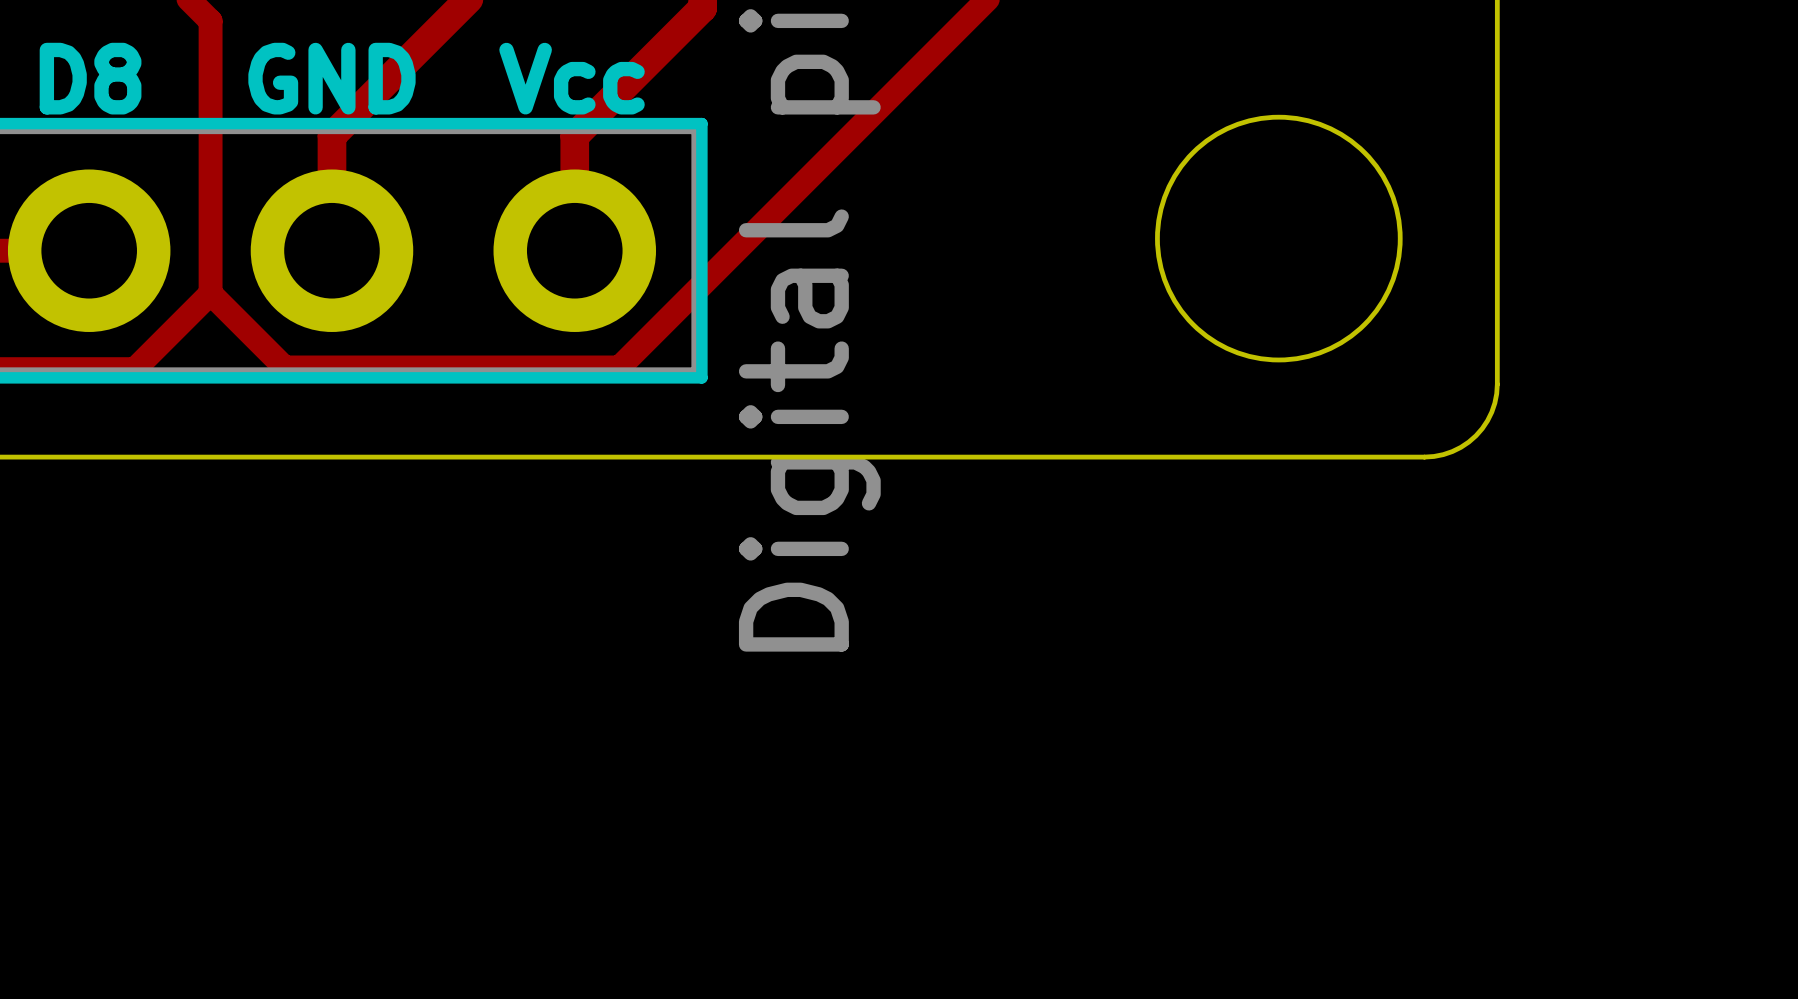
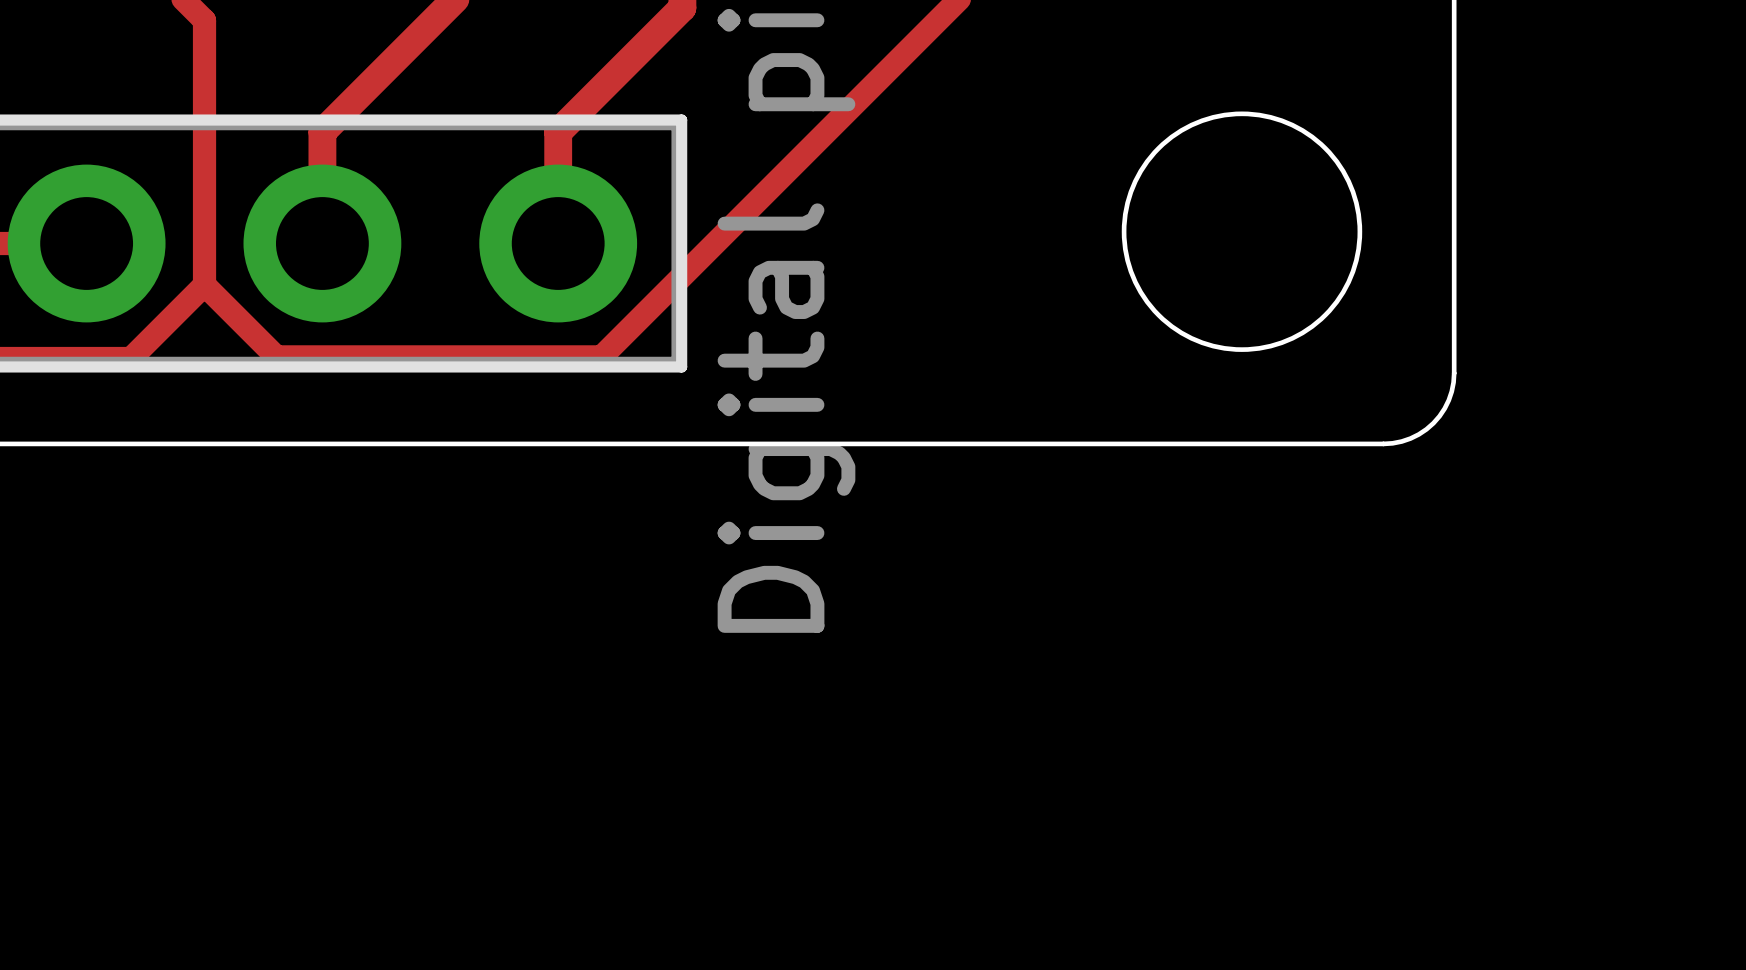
text: D8 (90, 78) -> none
text: GND (331, 78) -> none
text: Vcc (572, 78) -> none

